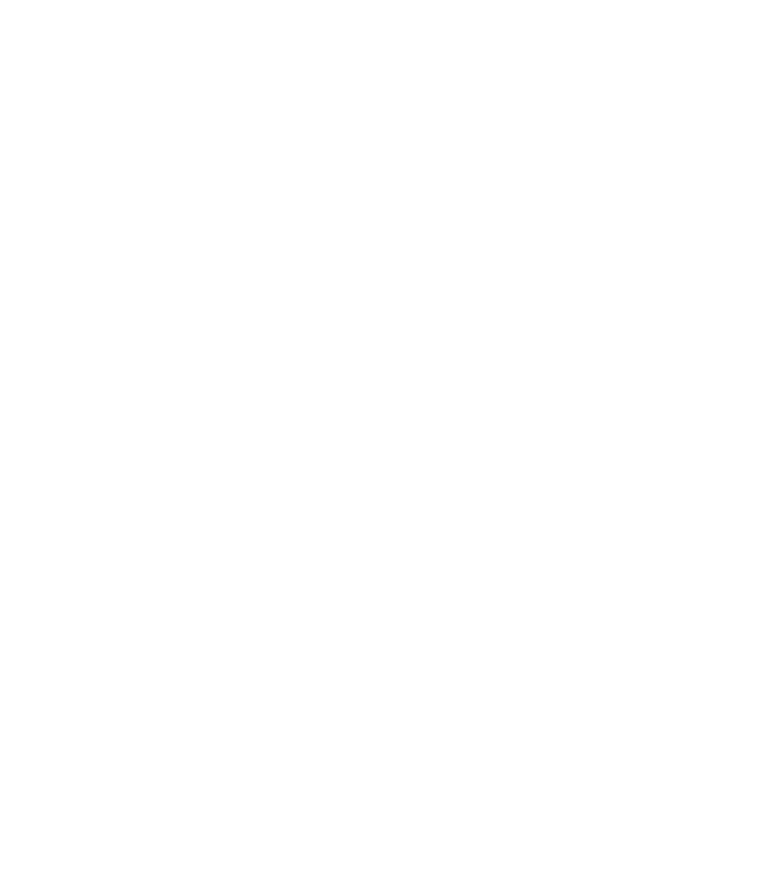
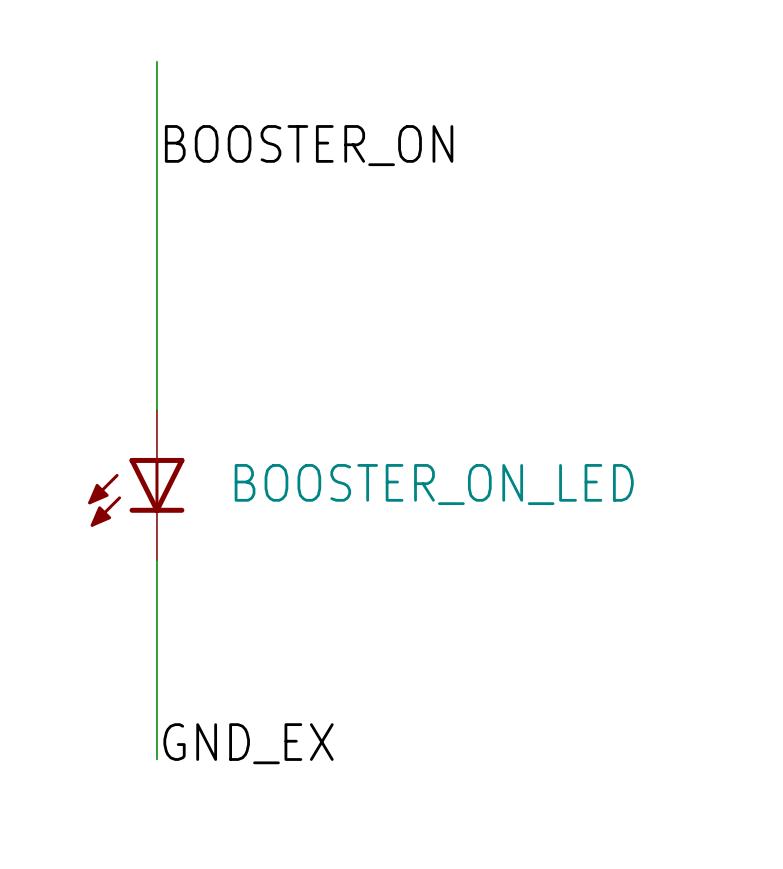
wire: none -> (156, 61) (156, 410)
label: none -> BOOSTER_ON (309, 145)
BOOSTER_ON_LED: none -> (136, 485)
wire: none -> (156, 560) (156, 759)
label: none -> GND_EX (248, 743)

